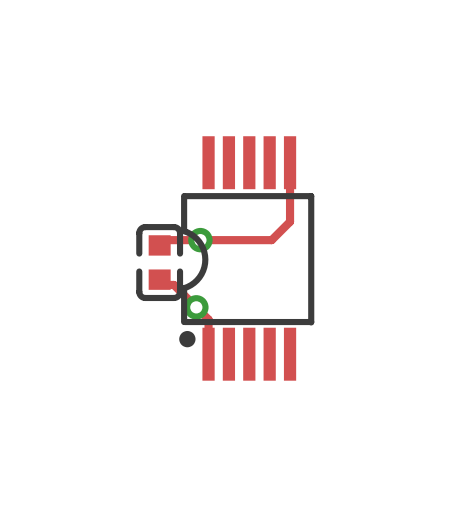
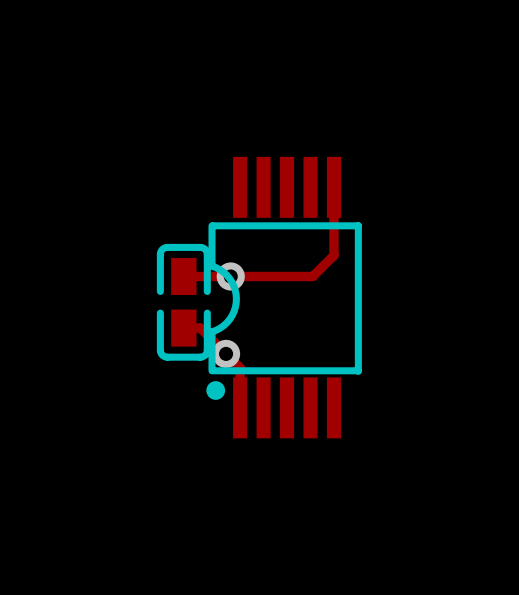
part footprint: [136, 224, 184, 302] -> [156, 243, 211, 361]

